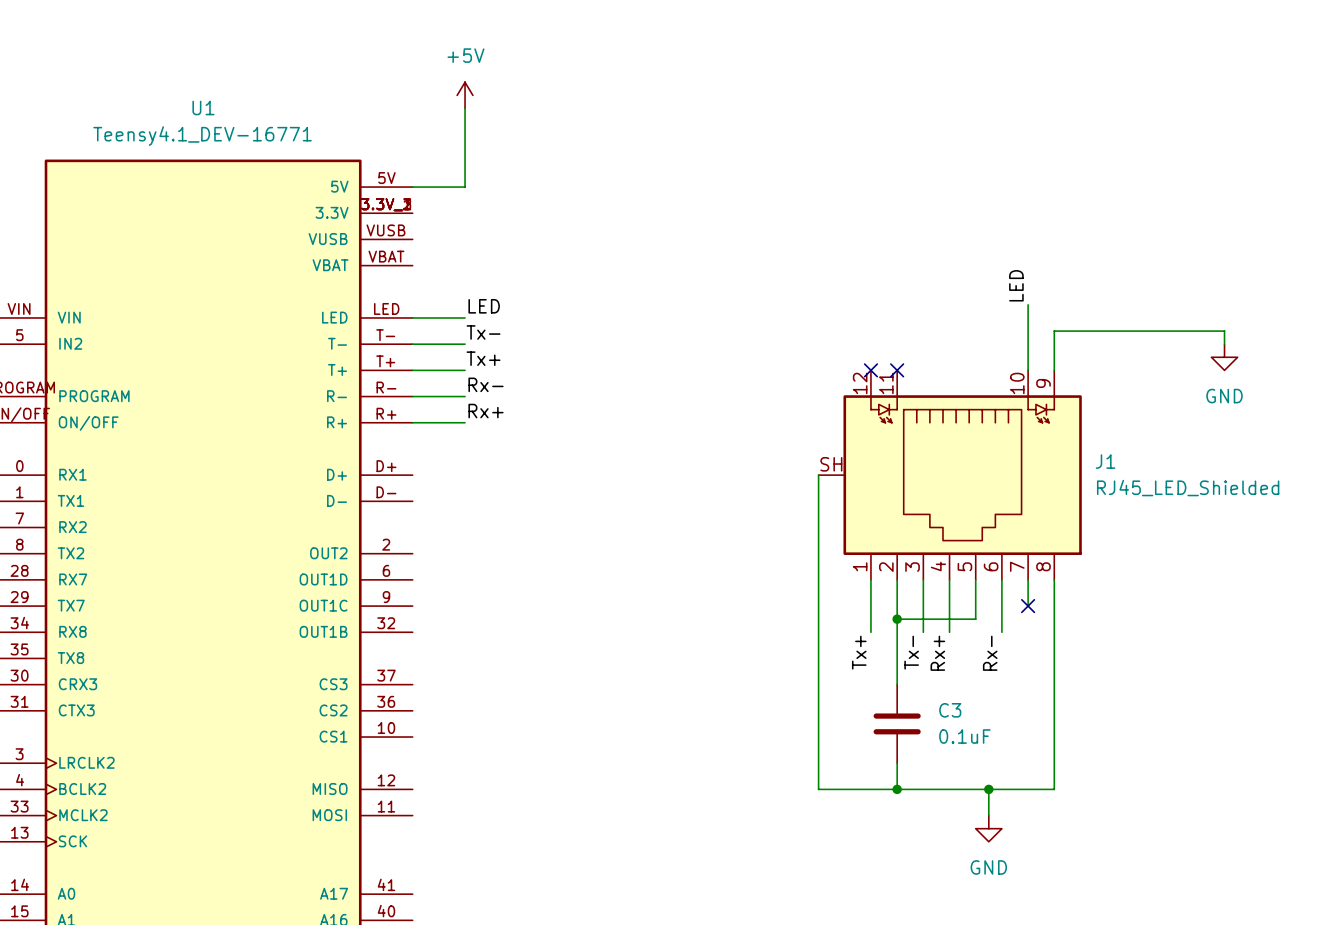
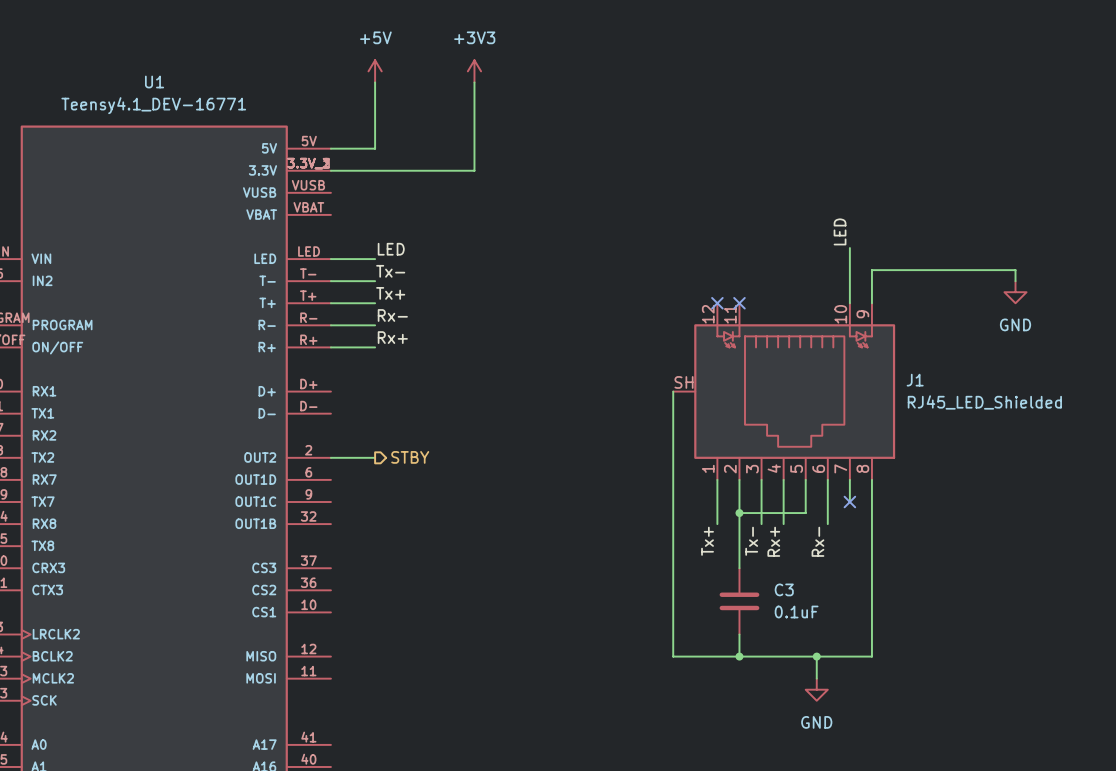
power symbol: none -> +3V3 (474, 71)
wire: none -> (474, 82) (474, 170) (330, 170)
wire: none -> (330, 457) (375, 457)
hierarchical label: none -> STBY (410, 457)

